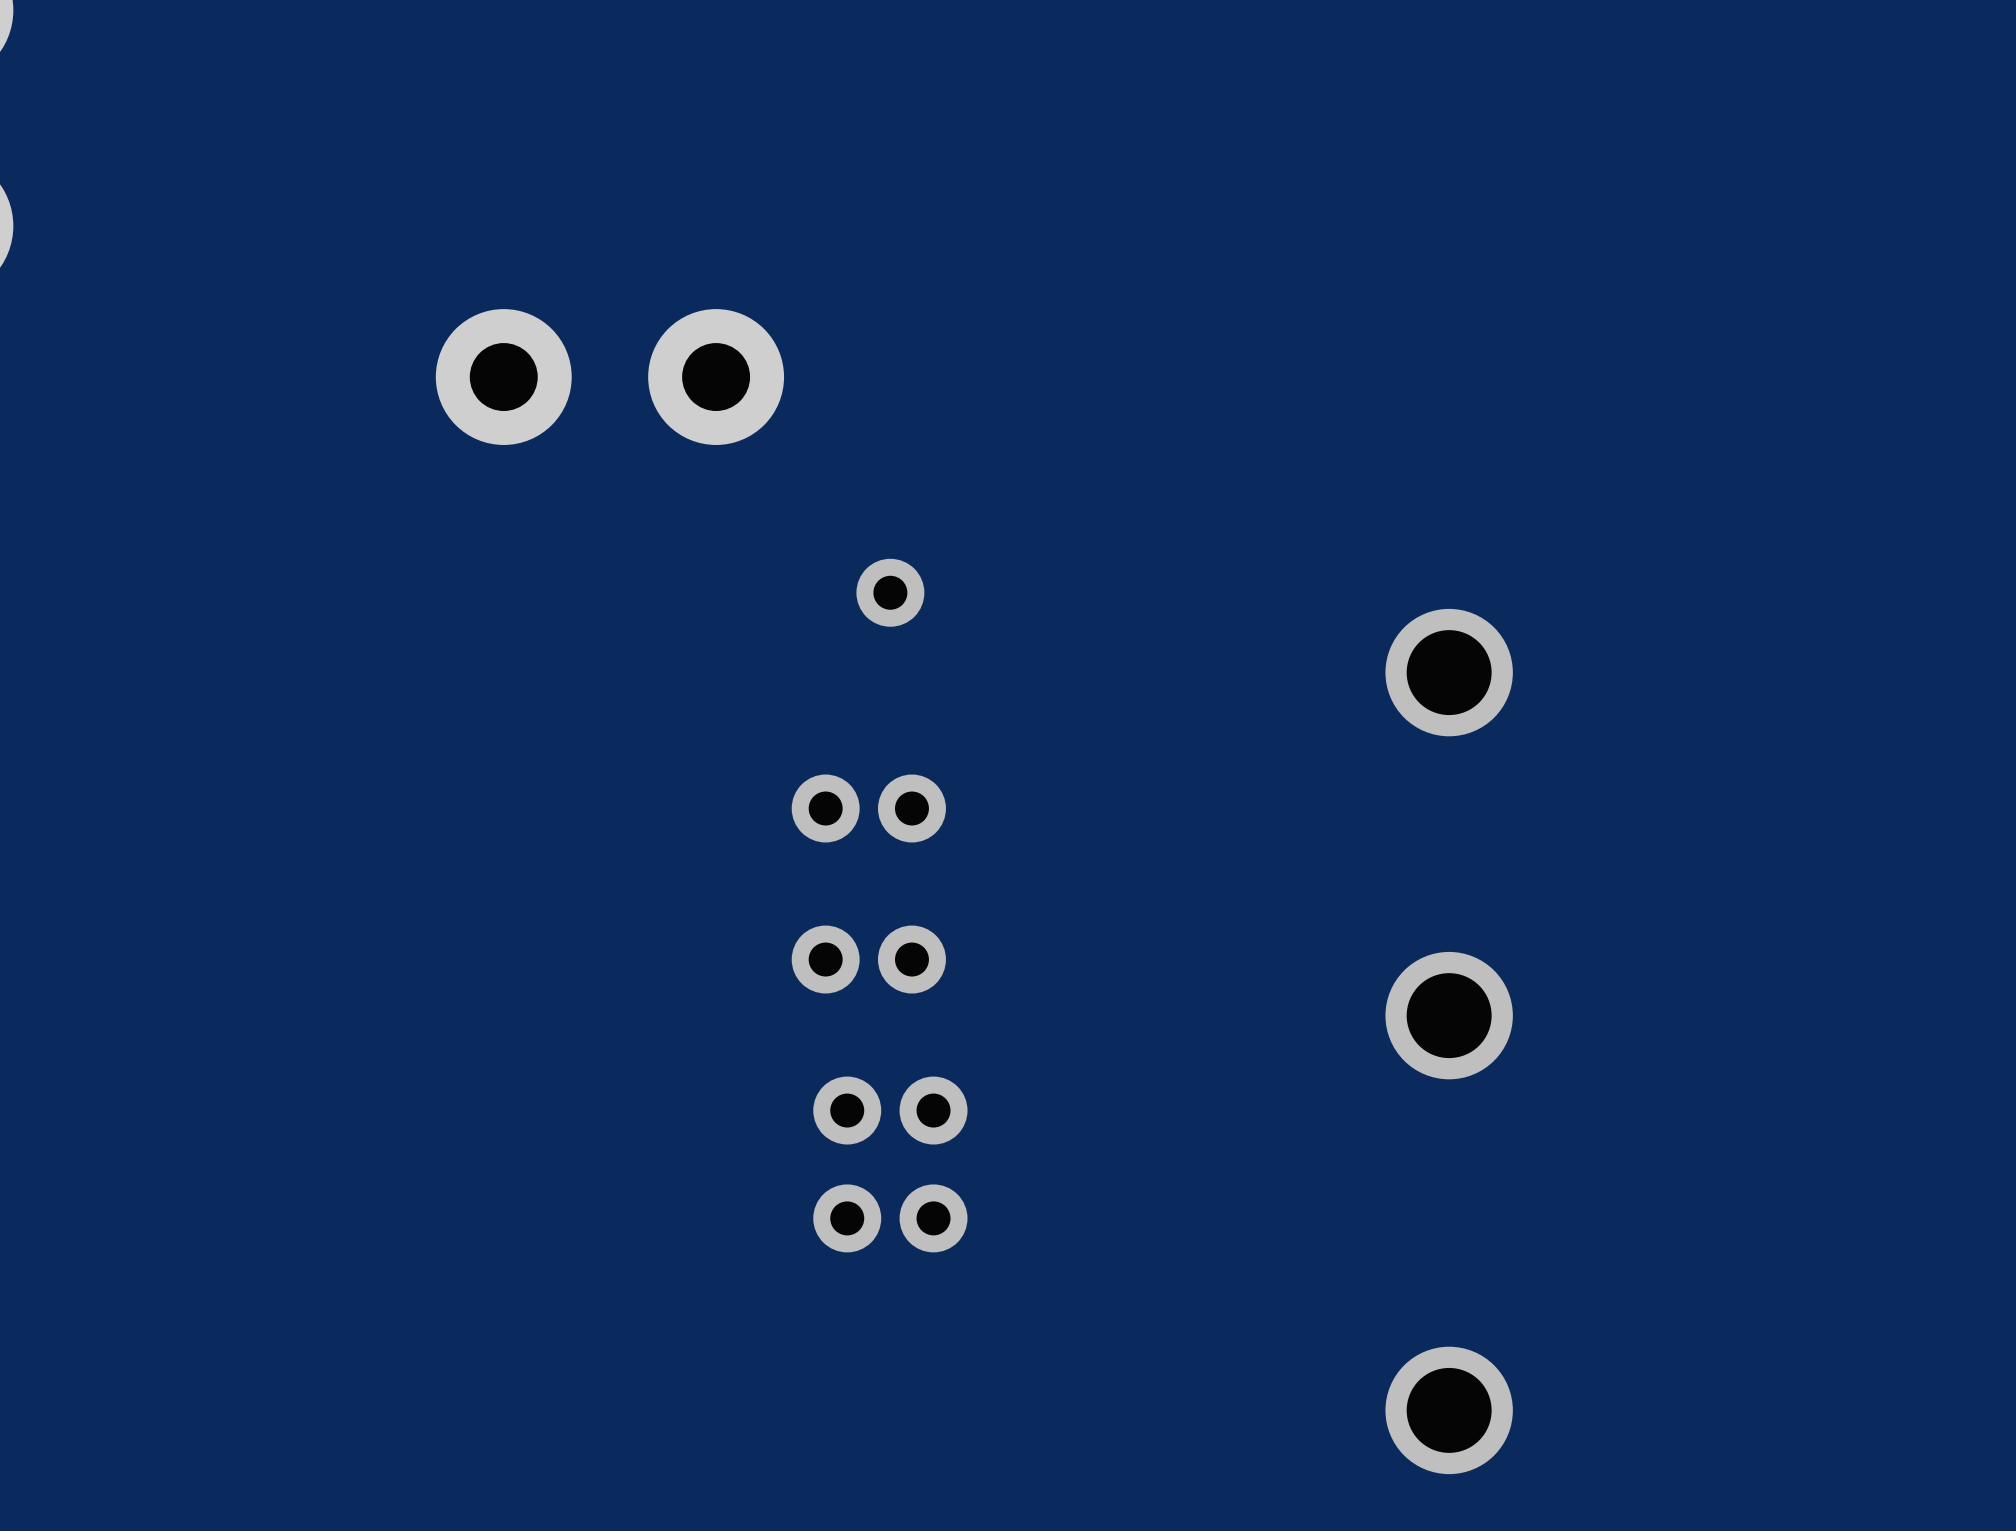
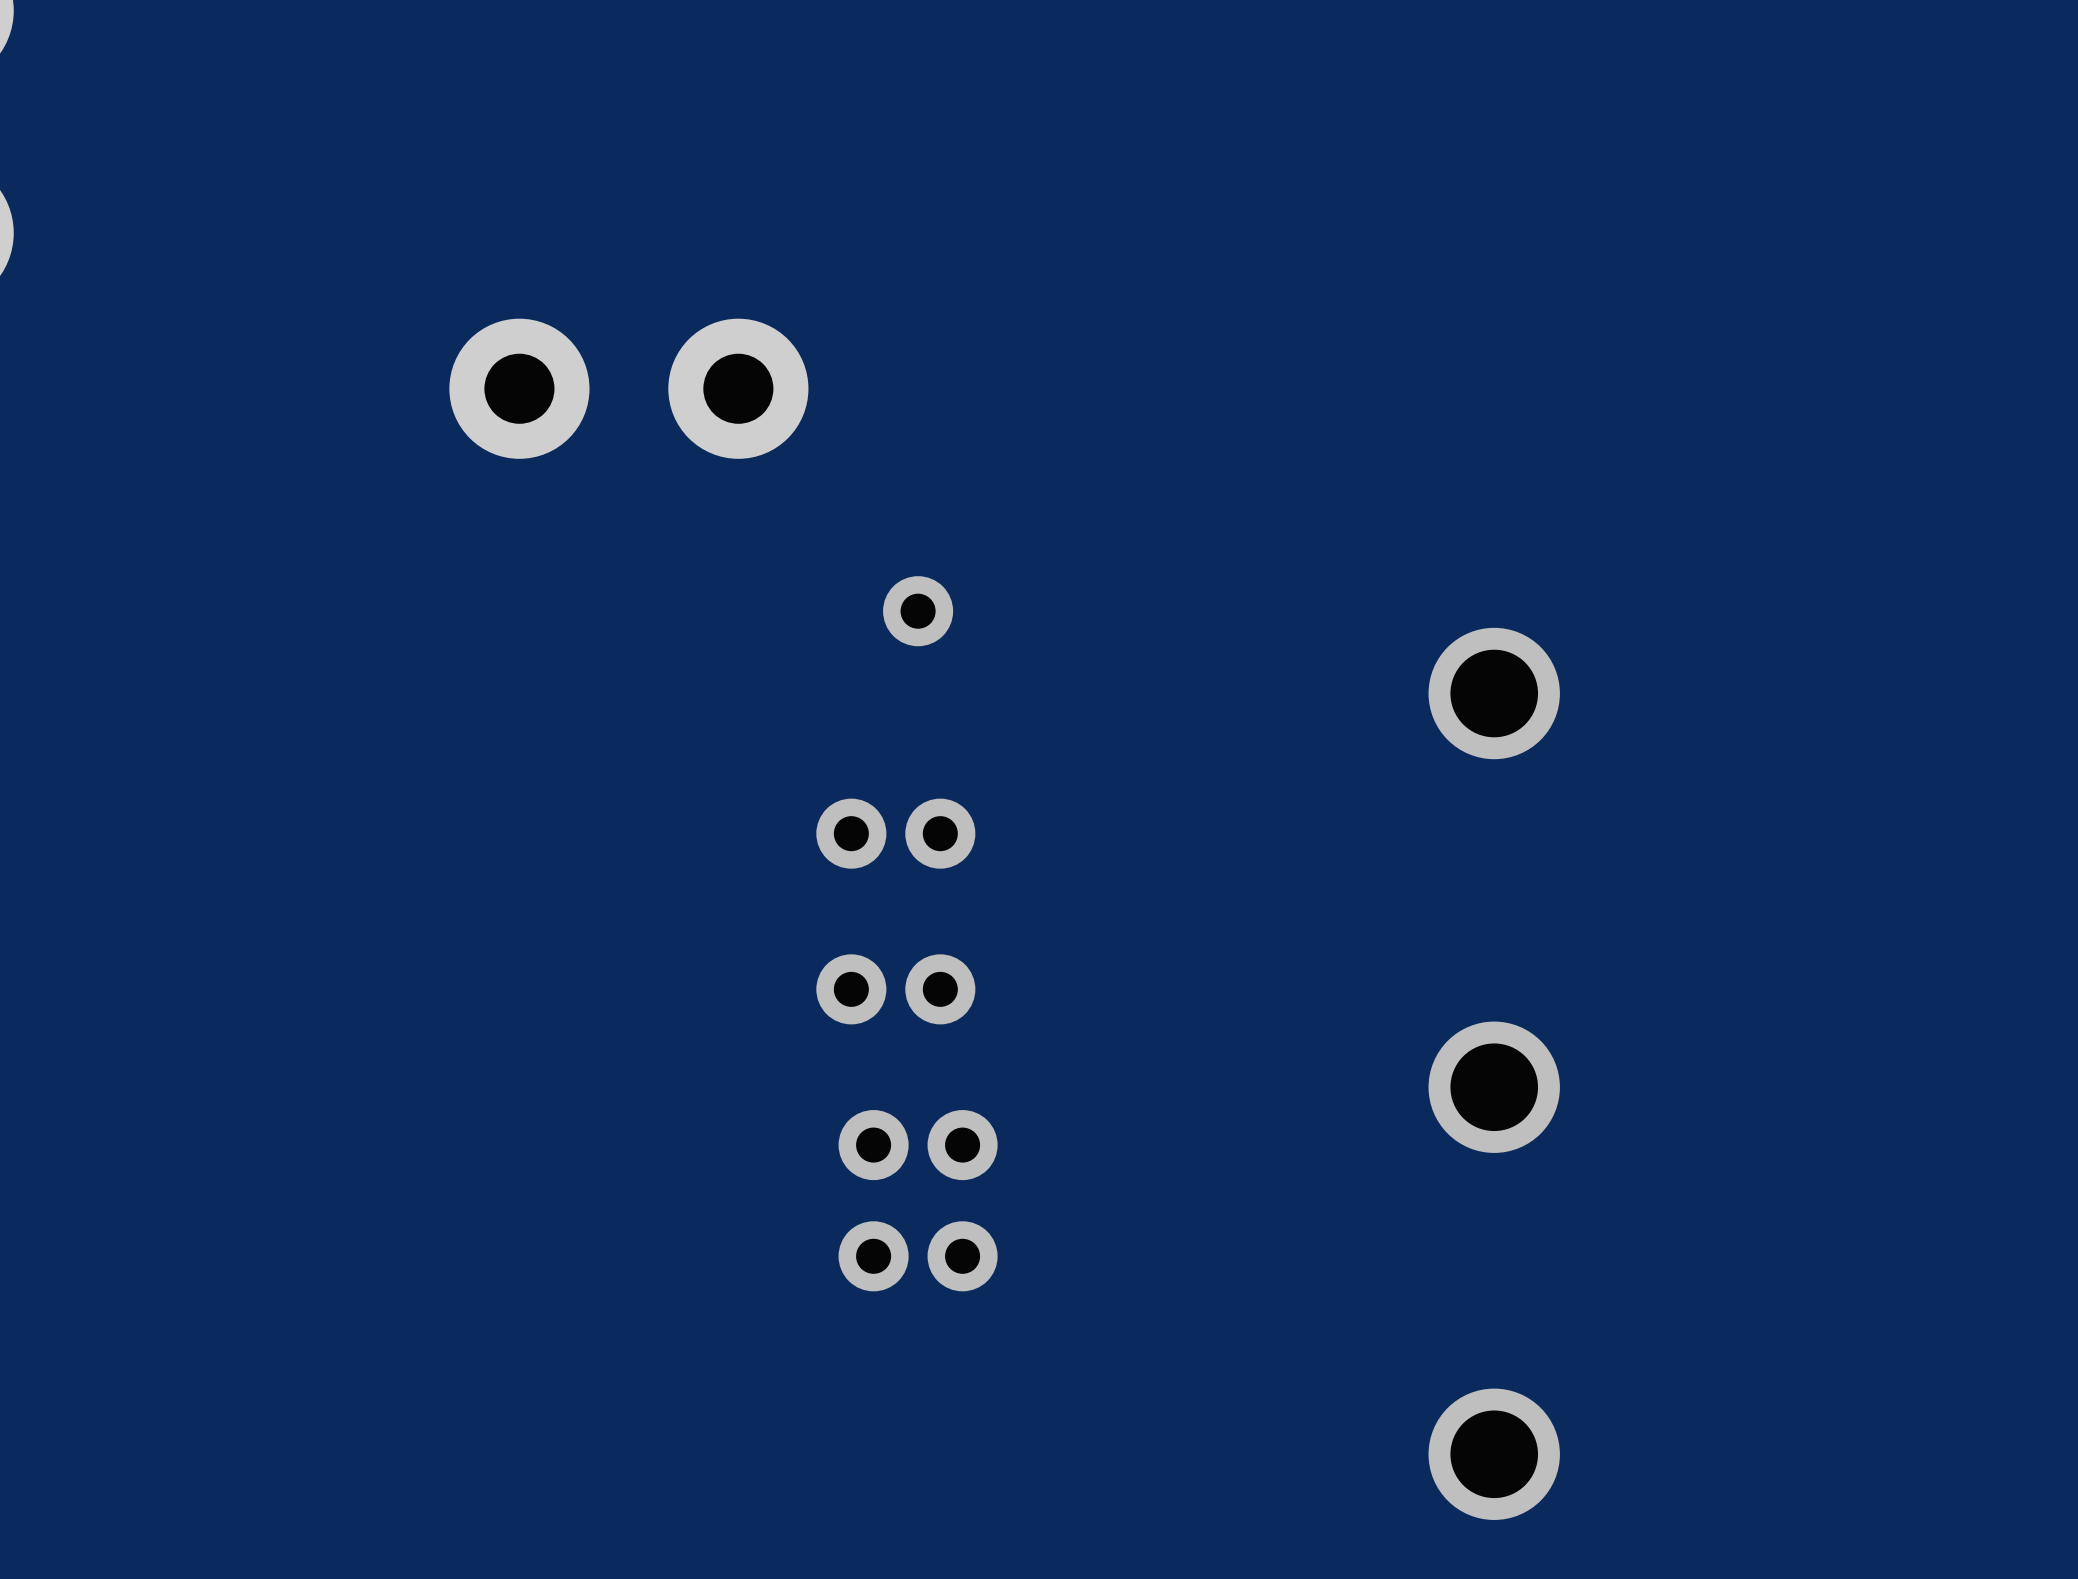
via position: (1449, 1015) -> (1494, 1087)

